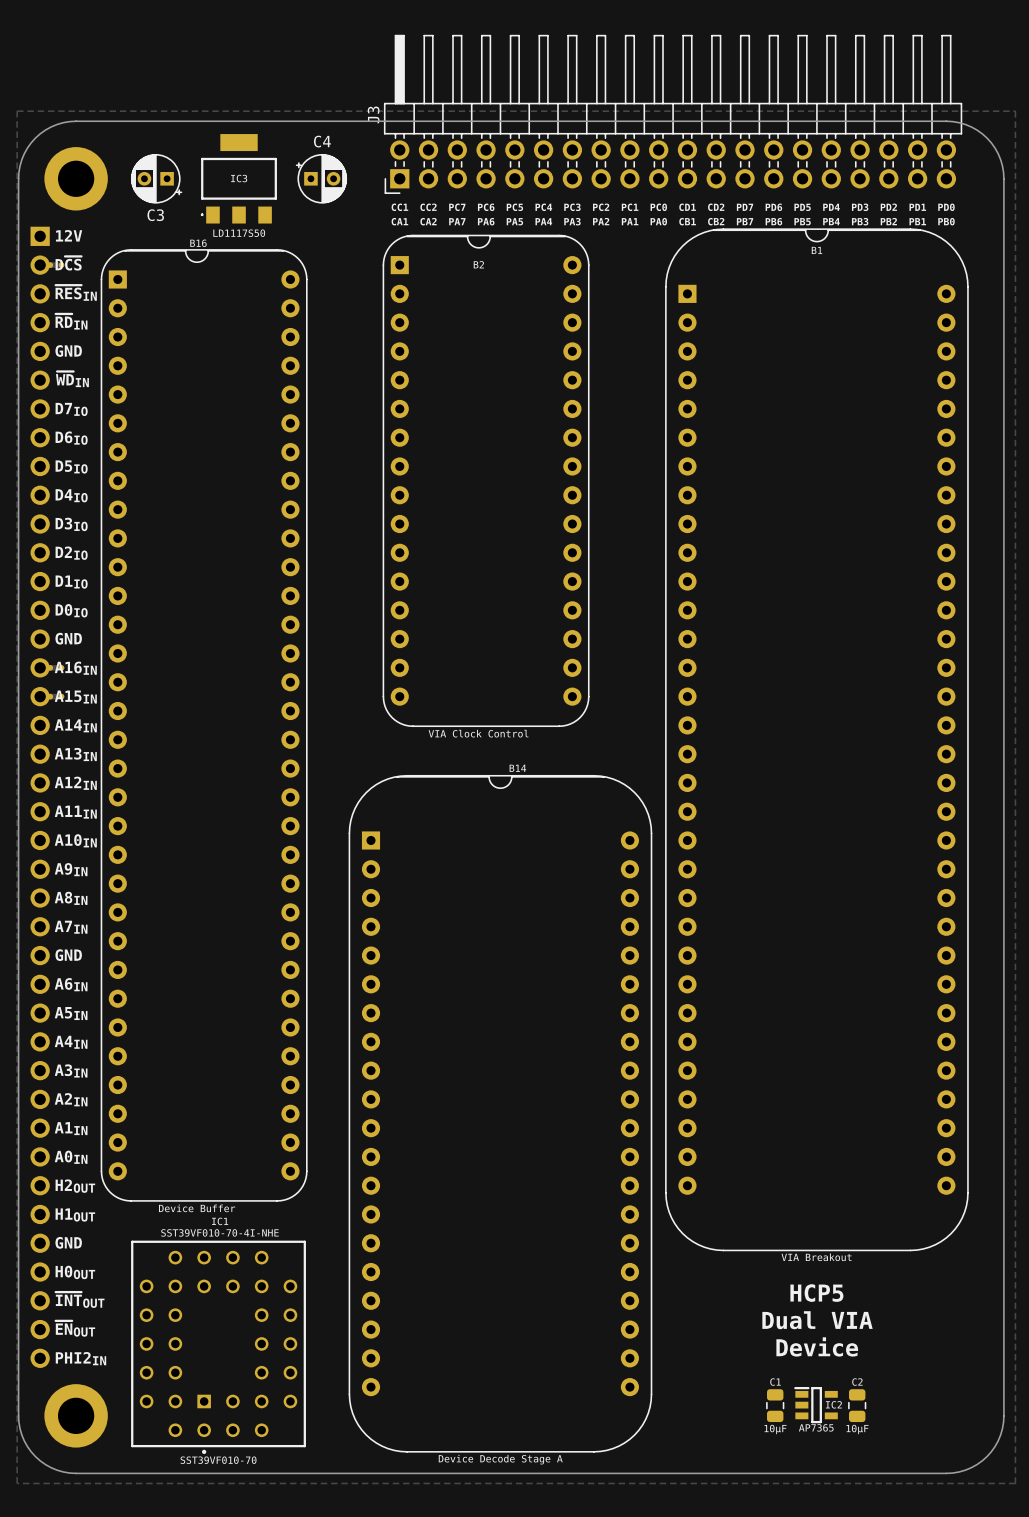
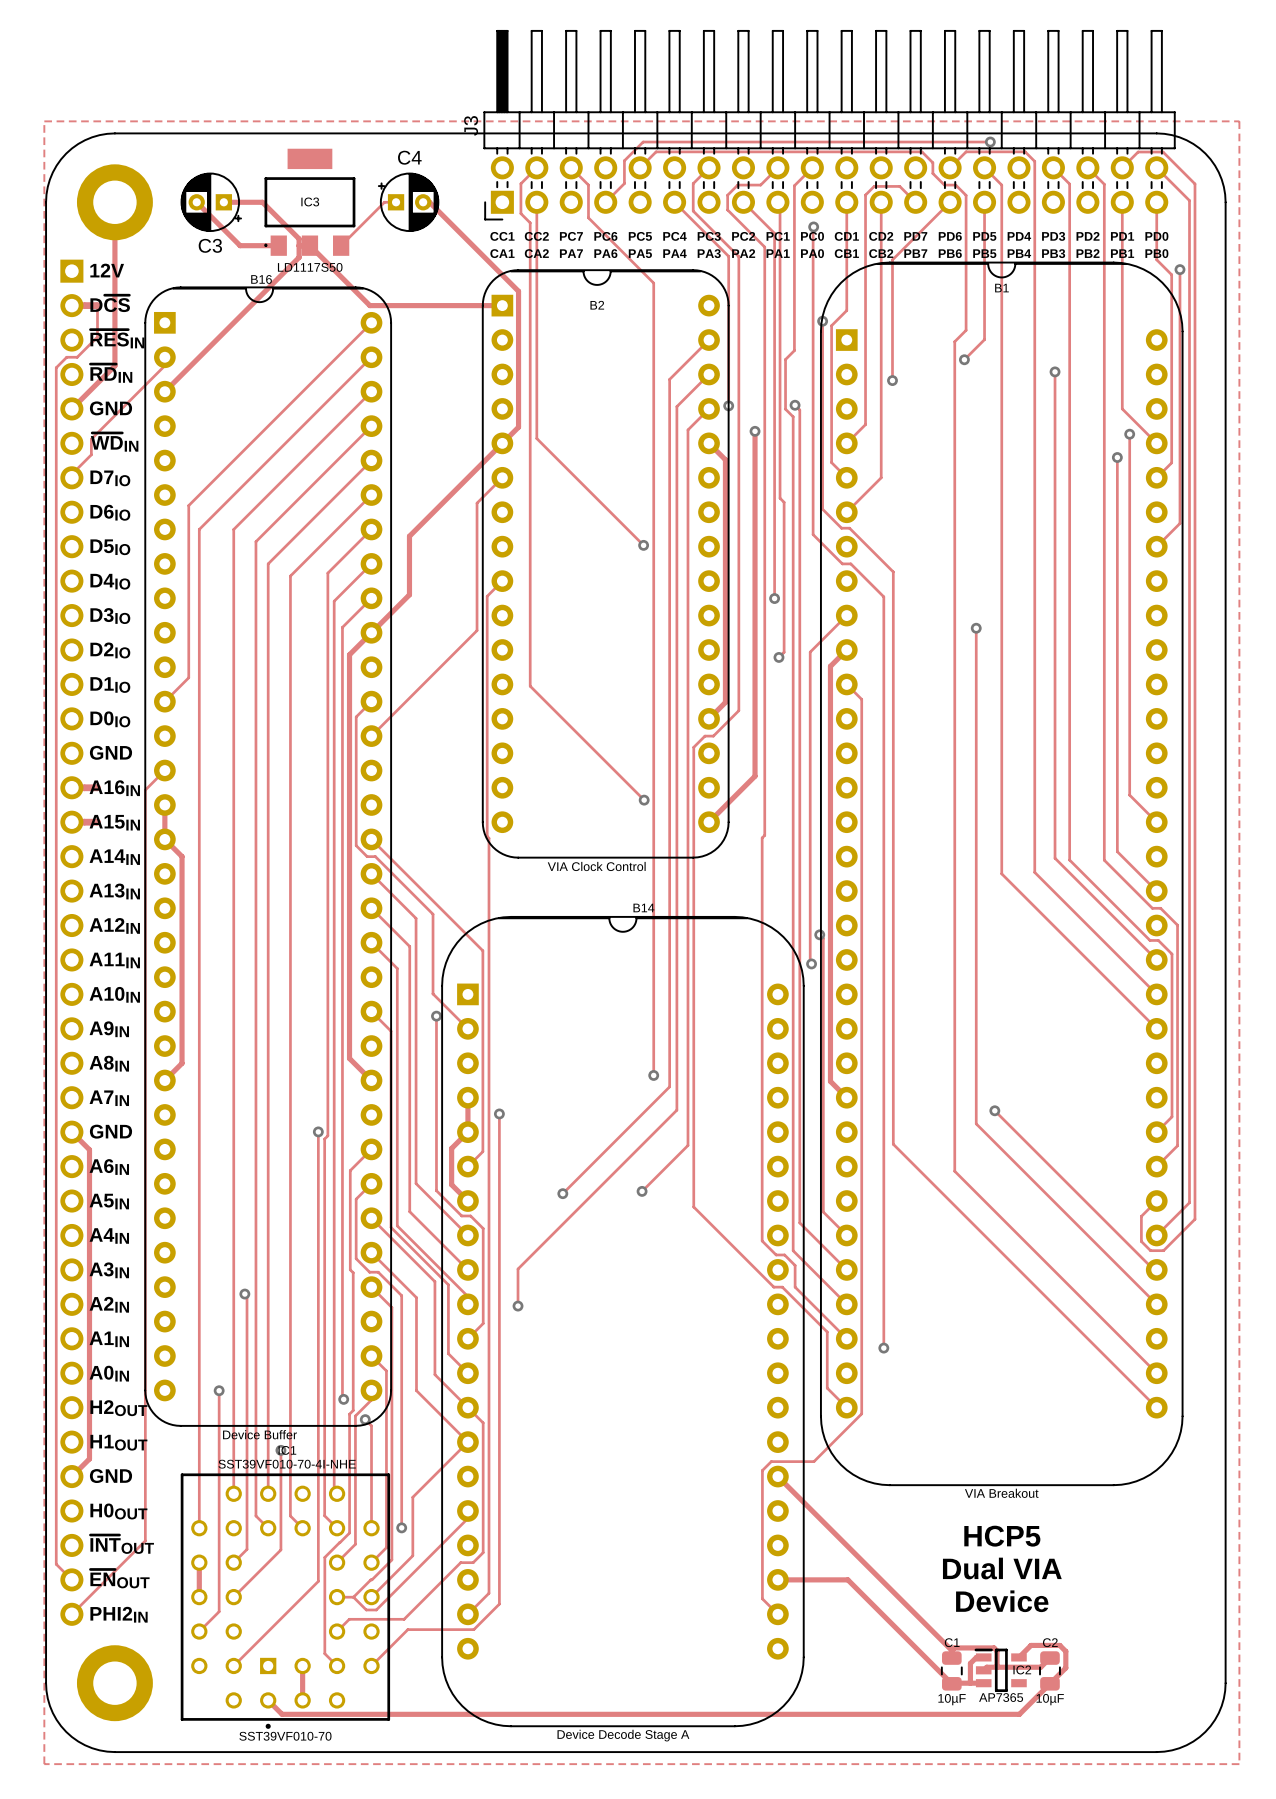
track: none -> (990, 142) (643, 142) (624, 160) (624, 183) (605, 202)
via: none -> (990, 142)
track: none -> (536, 167) (520, 183) (520, 213) (530, 222) (530, 686) (644, 800)
track: none -> (571, 167) (588, 185) (588, 217) (653, 283) (653, 1075)
track: none -> (640, 167) (656, 151) (921, 151) (932, 162) (932, 173) (944, 185) (955, 185) (966, 195) (966, 330) (954, 341) (954, 1171) (1156, 1373)
track: none -> (709, 167) (693, 183) (693, 211) (738, 256) (738, 710) (713, 736) (704, 736) (693, 747) (693, 1207) (773, 1287) (782, 1287) (827, 1332) (827, 1388) (846, 1407)
track: none -> (777, 167) (760, 185) (737, 185) (727, 195) (727, 209) (764, 247) (764, 835) (762, 837) (762, 1240) (776, 1254) (784, 1254) (795, 1265) (795, 1287) (846, 1338)
track: none -> (812, 167) (794, 185) (794, 350) (785, 359) (785, 409) (793, 416) (793, 1250) (846, 1304)
track: none -> (950, 167) (966, 151) (1025, 151) (1034, 161) (1034, 872) (1156, 994)
track: none -> (984, 167) (1001, 185) (1001, 873) (1156, 1028)
track: none -> (1053, 167) (1069, 184) (1069, 860) (1150, 940) (1158, 940) (1172, 954) (1172, 1116) (1156, 1132)
track: none -> (1087, 167) (1104, 184) (1104, 860) (1152, 908) (1160, 908) (1177, 925) (1177, 1145) (1156, 1166)
track: none -> (1122, 167) (1138, 152) (1163, 152) (1194, 183) (1194, 1219) (1163, 1250) (1150, 1250) (1141, 1241) (1141, 1216) (1156, 1201)
track: none -> (1156, 167) (1189, 200) (1189, 1202) (1156, 1235)
track: none -> (114, 202) (114, 365) (71, 408)
track: none -> (196, 202) (240, 245) (278, 245)
track: none -> (223, 202) (262, 202) (299, 238) (299, 257) (164, 391)
track: none -> (396, 202) (384, 202) (341, 245)
track: none -> (423, 202) (429, 202) (518, 291) (518, 427) (409, 536) (409, 594) (349, 654) (349, 1058) (371, 1080)
track: none -> (536, 202) (536, 438) (643, 545)
track: none -> (674, 202) (728, 256) (728, 405)
track: none -> (743, 202) (774, 233) (774, 598)
track: none -> (777, 202) (780, 204) (780, 498) (784, 502) (784, 652) (778, 657)
track: none -> (846, 202) (846, 310) (831, 325) (831, 462) (846, 477)
track: none -> (881, 202) (881, 477) (846, 512)
track: none -> (915, 202) (899, 186) (874, 186) (865, 195) (865, 424) (846, 443)
track: none -> (950, 202) (892, 259) (892, 380)
track: none -> (984, 202) (984, 339) (964, 359)
track: none -> (1122, 202) (1122, 408) (1156, 443)
track: none -> (1156, 202) (1156, 259) (1171, 274) (1171, 462) (1156, 477)
track: none -> (813, 226) (813, 534) (842, 563) (850, 563) (883, 596) (883, 1348)
via: none -> (813, 226)
track: none -> (299, 245) (309, 245) (369, 305) (502, 305)
track: none -> (1179, 269) (1179, 523) (1156, 546)
via: none -> (1179, 269)
track: none -> (97, 305) (97, 336) (77, 357) (66, 357) (56, 367) (56, 1564) (71, 1579)
track: none -> (822, 321) (822, 509) (841, 528) (849, 528) (893, 571) (893, 1144) (1156, 1407)
via: none -> (822, 321)
track: none -> (371, 322) (188, 505) (188, 677) (164, 701)
track: none -> (709, 340) (669, 379) (669, 1086) (562, 1193)
track: none -> (164, 357) (164, 365) (91, 439) (91, 454) (71, 474) (71, 477)
track: none -> (371, 357) (199, 529) (199, 1528)
via: none -> (964, 359)
track: none -> (1055, 371) (1055, 858) (1156, 959)
via: none -> (1055, 371)
track: none -> (709, 374) (676, 406) (676, 1110) (518, 1269) (518, 1306)
via: none -> (892, 380)
track: none -> (371, 391) (233, 529) (233, 1493)
via: none -> (728, 405)
track: none -> (795, 405) (799, 409) (799, 1222) (846, 1269)
via: none -> (795, 405)
track: none -> (709, 408) (687, 429) (687, 1145) (642, 1191)
track: none -> (371, 426) (255, 541) (255, 1515) (268, 1528)
track: none -> (755, 431) (755, 776) (709, 822)
via: none -> (755, 431)
track: none -> (1129, 434) (1129, 795) (1156, 822)
via: none -> (1129, 434)
track: none -> (709, 443) (725, 459) (725, 702) (709, 718)
track: none -> (1117, 457) (1117, 851) (1156, 891)
via: none -> (1117, 457)
track: none -> (371, 460) (268, 563) (268, 1493)
track: none -> (502, 477) (477, 503) (477, 630) (371, 736)
track: none -> (371, 495) (290, 576) (290, 1515) (302, 1528)
track: none -> (371, 529) (327, 573) (327, 1135) (324, 1139) (324, 1515) (337, 1528)
via: none -> (643, 545)
track: none -> (371, 563) (334, 601) (334, 1490) (337, 1493)
track: none -> (502, 581) (487, 596) (489, 1593) (467, 1614)
track: none -> (371, 598) (342, 627) (343, 1399)
via: none -> (774, 598)
track: none -> (846, 615) (810, 652) (811, 963)
track: none -> (976, 628) (976, 1123) (1156, 1304)
via: none -> (976, 628)
track: none -> (846, 650) (830, 666) (830, 1081) (846, 1097)
via: none -> (778, 657)
track: none -> (846, 684) (861, 699) (861, 1413) (813, 1461) (771, 1461) (762, 1470) (762, 1598) (777, 1614)
track: none -> (371, 701) (356, 716) (356, 845) (367, 856) (375, 856) (433, 914) (433, 993) (467, 1028)
track: none -> (164, 770) (145, 790) (145, 1540) (71, 1614)
via: none -> (644, 800)
track: none -> (164, 804) (164, 839) (182, 856) (182, 1063) (164, 1080)
track: none -> (371, 839) (482, 950) (482, 1151) (467, 1166)
track: none -> (371, 873) (416, 918) (416, 1183) (467, 1235)
track: none -> (371, 908) (409, 946) (409, 1211) (467, 1269)
track: none -> (819, 934) (823, 938) (823, 1212) (846, 1235)
via: none -> (819, 934)
track: none -> (371, 942) (397, 968) (397, 1225) (467, 1296) (467, 1304)
via: none -> (811, 963)
track: none -> (371, 1011) (391, 1031) (391, 1227) (448, 1284) (448, 1353) (467, 1373)
track: none -> (436, 1016) (436, 1190) (461, 1215) (470, 1215) (483, 1228) (483, 1323) (467, 1338)
via: none -> (436, 1016)
via: none -> (653, 1075)
track: none -> (467, 1097) (467, 1132) (451, 1148) (451, 1184) (467, 1201)
track: none -> (994, 1110) (1153, 1269) (1156, 1269)
via: none -> (994, 1110)
track: none -> (499, 1113) (499, 1604) (473, 1629) (407, 1629) (371, 1665)
via: none -> (499, 1113)
track: none -> (71, 1132) (89, 1149) (89, 1458) (71, 1476)
track: none -> (318, 1131) (318, 1581) (233, 1665)
via: none -> (318, 1131)
track: none -> (371, 1149) (350, 1170) (350, 1269) (353, 1272) (353, 1410) (349, 1414) (349, 1533) (324, 1557) (324, 1653) (337, 1665)
track: none -> (371, 1183) (356, 1199) (356, 1258) (369, 1272) (378, 1272) (401, 1295) (401, 1527)
via: none -> (642, 1191)
via: none -> (562, 1193)
track: none -> (371, 1218) (434, 1281) (434, 1374) (483, 1422) (483, 1552) (473, 1562) (460, 1562) (404, 1619) (349, 1619) (337, 1631)
track: none -> (371, 1252) (416, 1297) (416, 1390) (467, 1442) (412, 1497) (412, 1555) (371, 1597)
track: none -> (371, 1287) (391, 1307) (391, 1559) (353, 1597)
track: none -> (244, 1294) (247, 1296) (247, 1549) (233, 1562)
via: none -> (244, 1294)
via: none -> (518, 1306)
via: none -> (883, 1348)
track: none -> (371, 1356) (386, 1370) (386, 1547) (371, 1562)
track: none -> (219, 1390) (219, 1611) (199, 1631)
via: none -> (219, 1390)
track: none -> (371, 1390) (371, 1399) (355, 1416) (355, 1544) (337, 1562)
via: none -> (343, 1399)
track: none -> (365, 1419) (371, 1425) (371, 1528)
via: none -> (365, 1419)
track: none -> (280, 1450) (280, 1549) (233, 1597)
via: none -> (280, 1450)
track: none -> (777, 1476) (951, 1650)
track: none -> (467, 1511) (467, 1518) (376, 1609) (366, 1609) (353, 1597)
via: none -> (401, 1527)
track: none -> (199, 1562) (199, 1597)
track: none -> (777, 1579) (847, 1579) (951, 1683) (983, 1683)
track: none -> (337, 1597) (353, 1597)
track: none -> (951, 1650) (954, 1647) (994, 1647) (997, 1650) (997, 1667)
track: none -> (983, 1657) (976, 1657) (970, 1663) (970, 1683)
track: none -> (1018, 1657) (1030, 1645) (1059, 1645) (1065, 1651) (1065, 1667) (1019, 1714) (282, 1714) (268, 1700)
track: none -> (1049, 1658) (1040, 1667) (986, 1667) (983, 1670)
track: none -> (302, 1665) (302, 1700)

